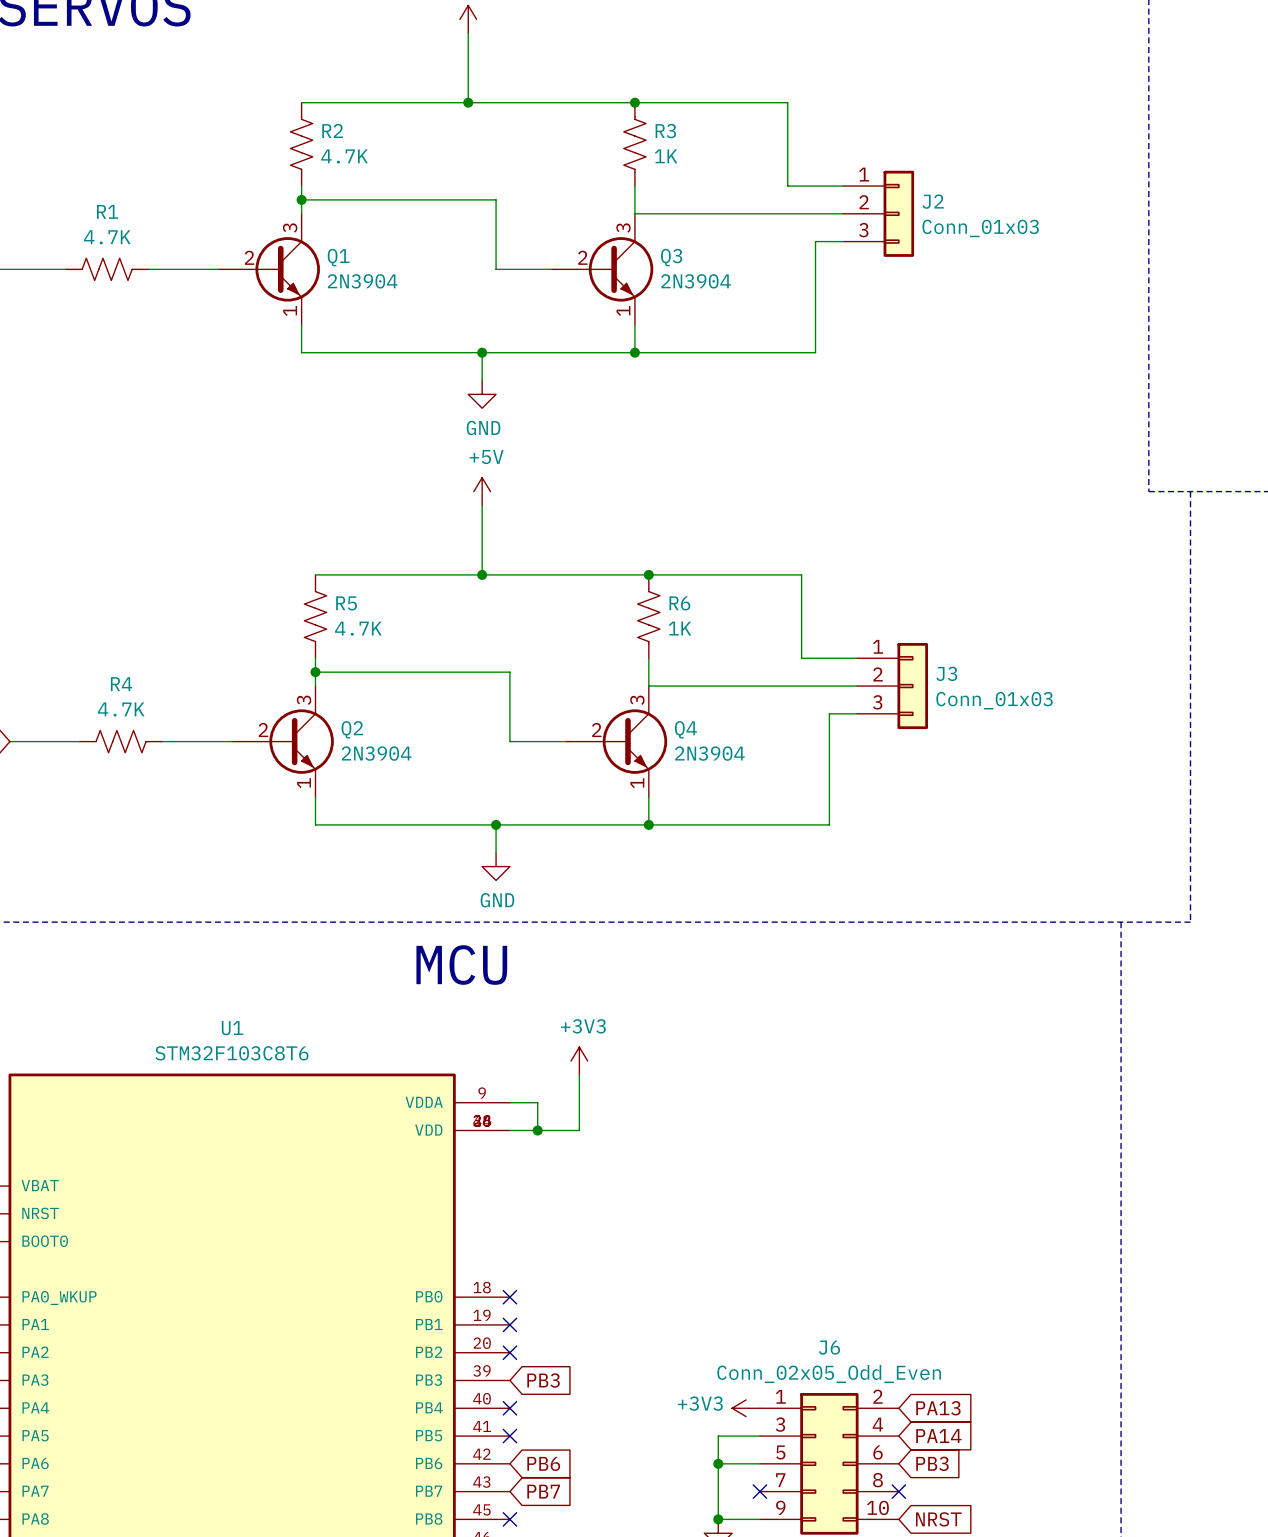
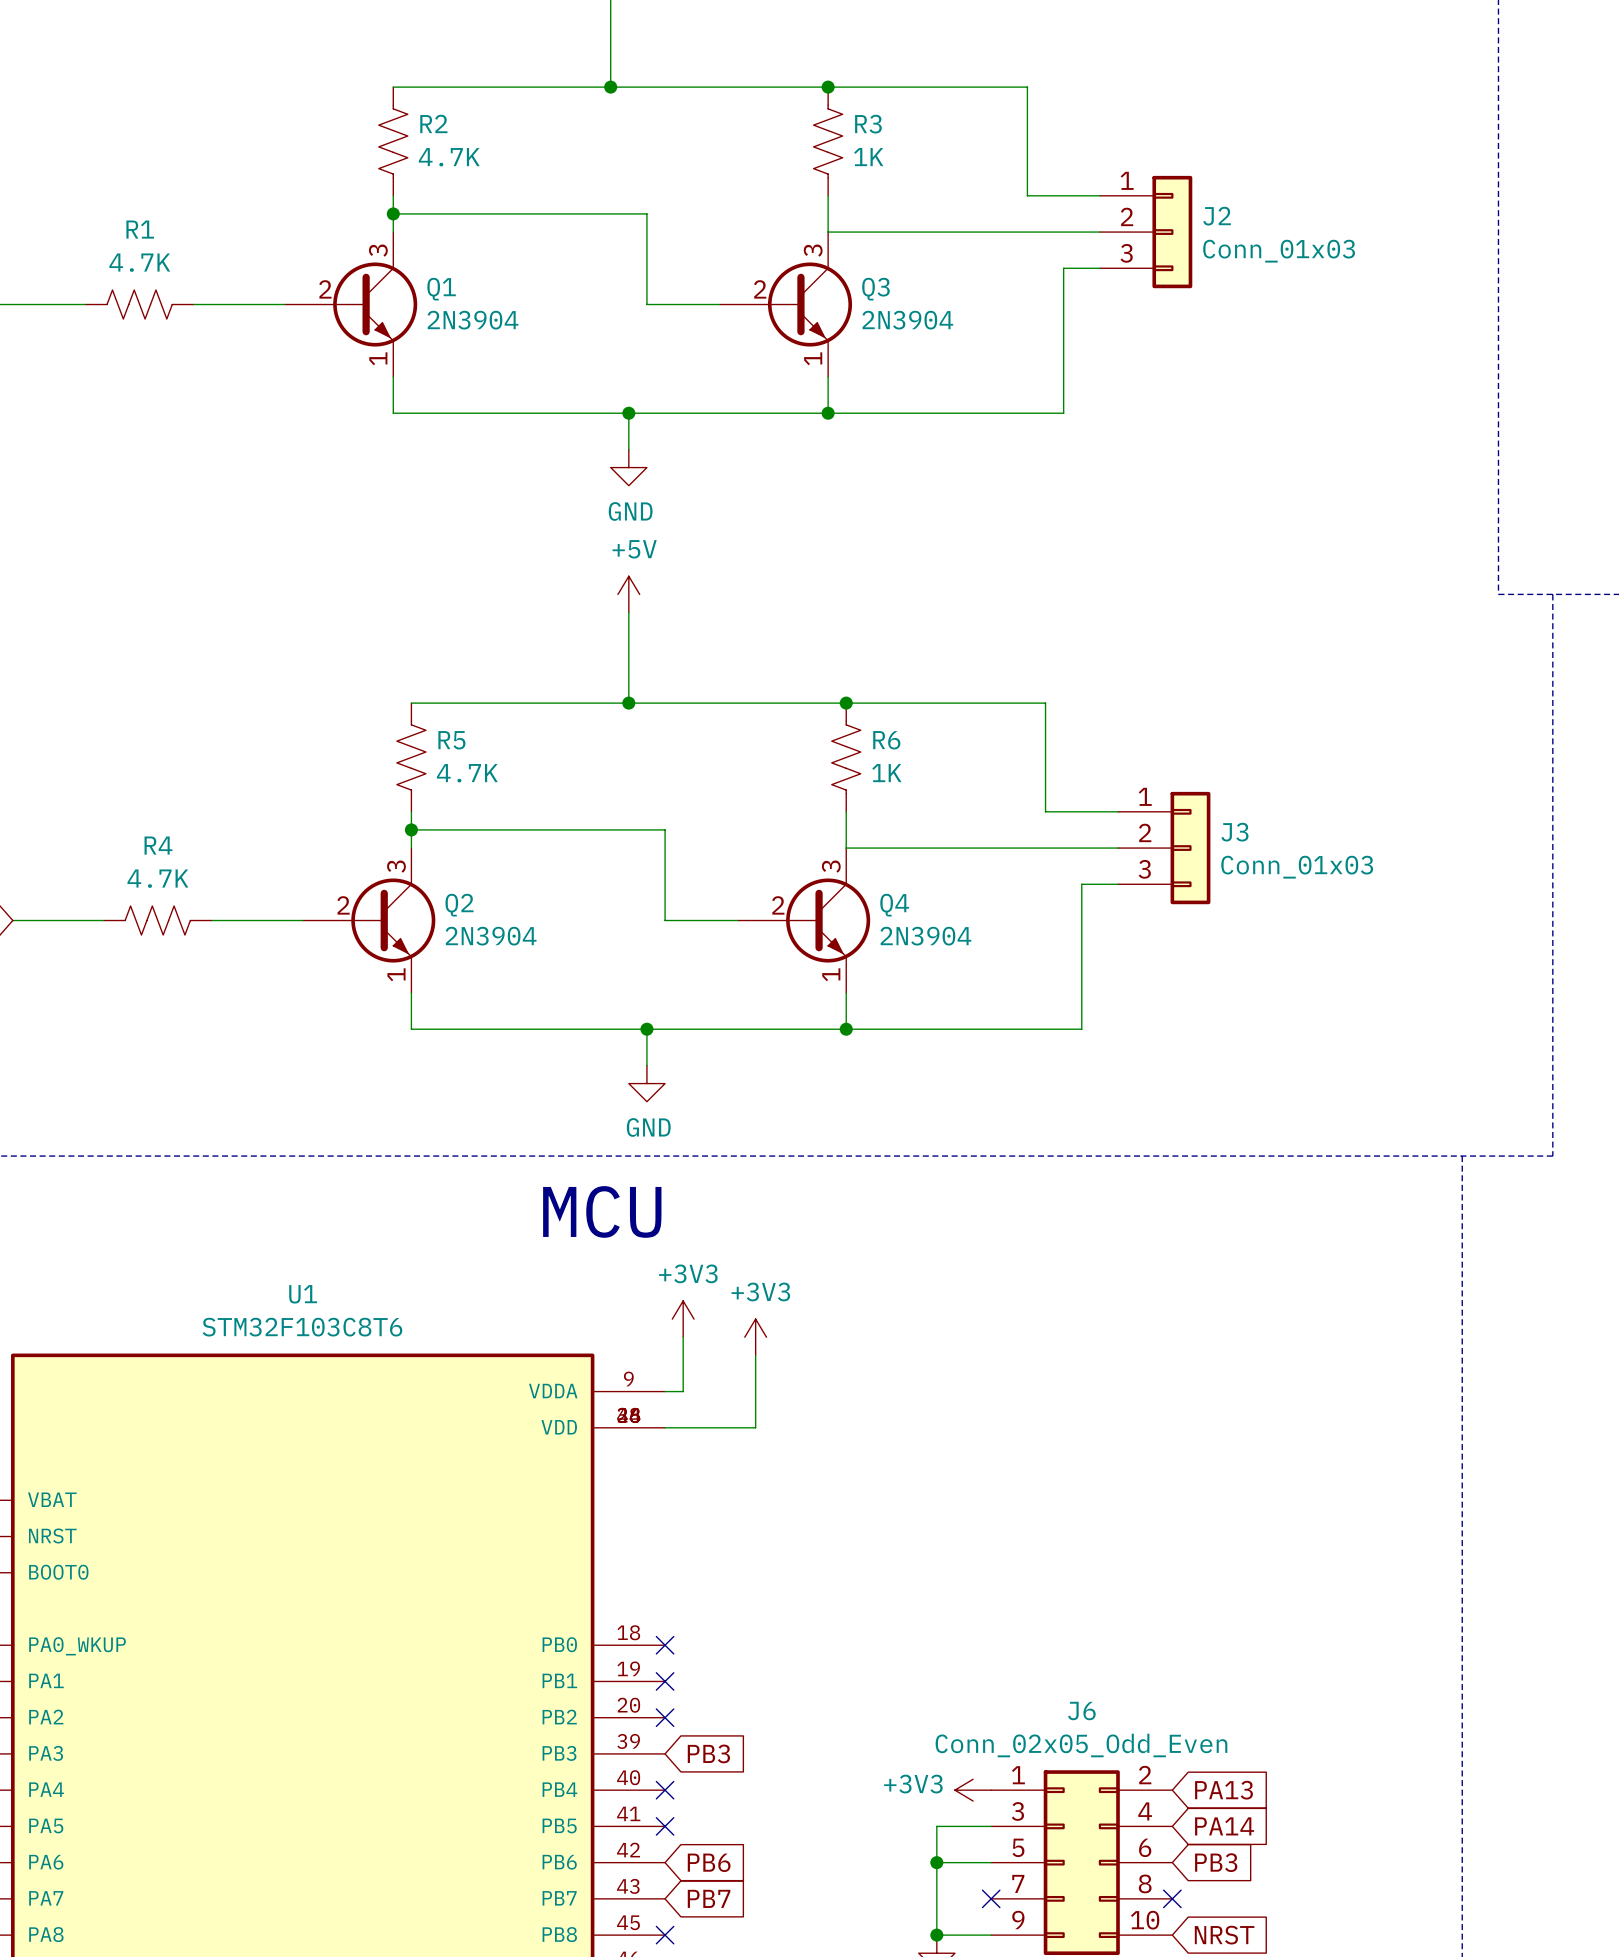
power symbol: none -> +3V3 (683, 1319)
wire: (523, 1102) (537, 1102) (537, 1130) -> (683, 1391) (683, 1337)
junction: (537, 1130) -> none

